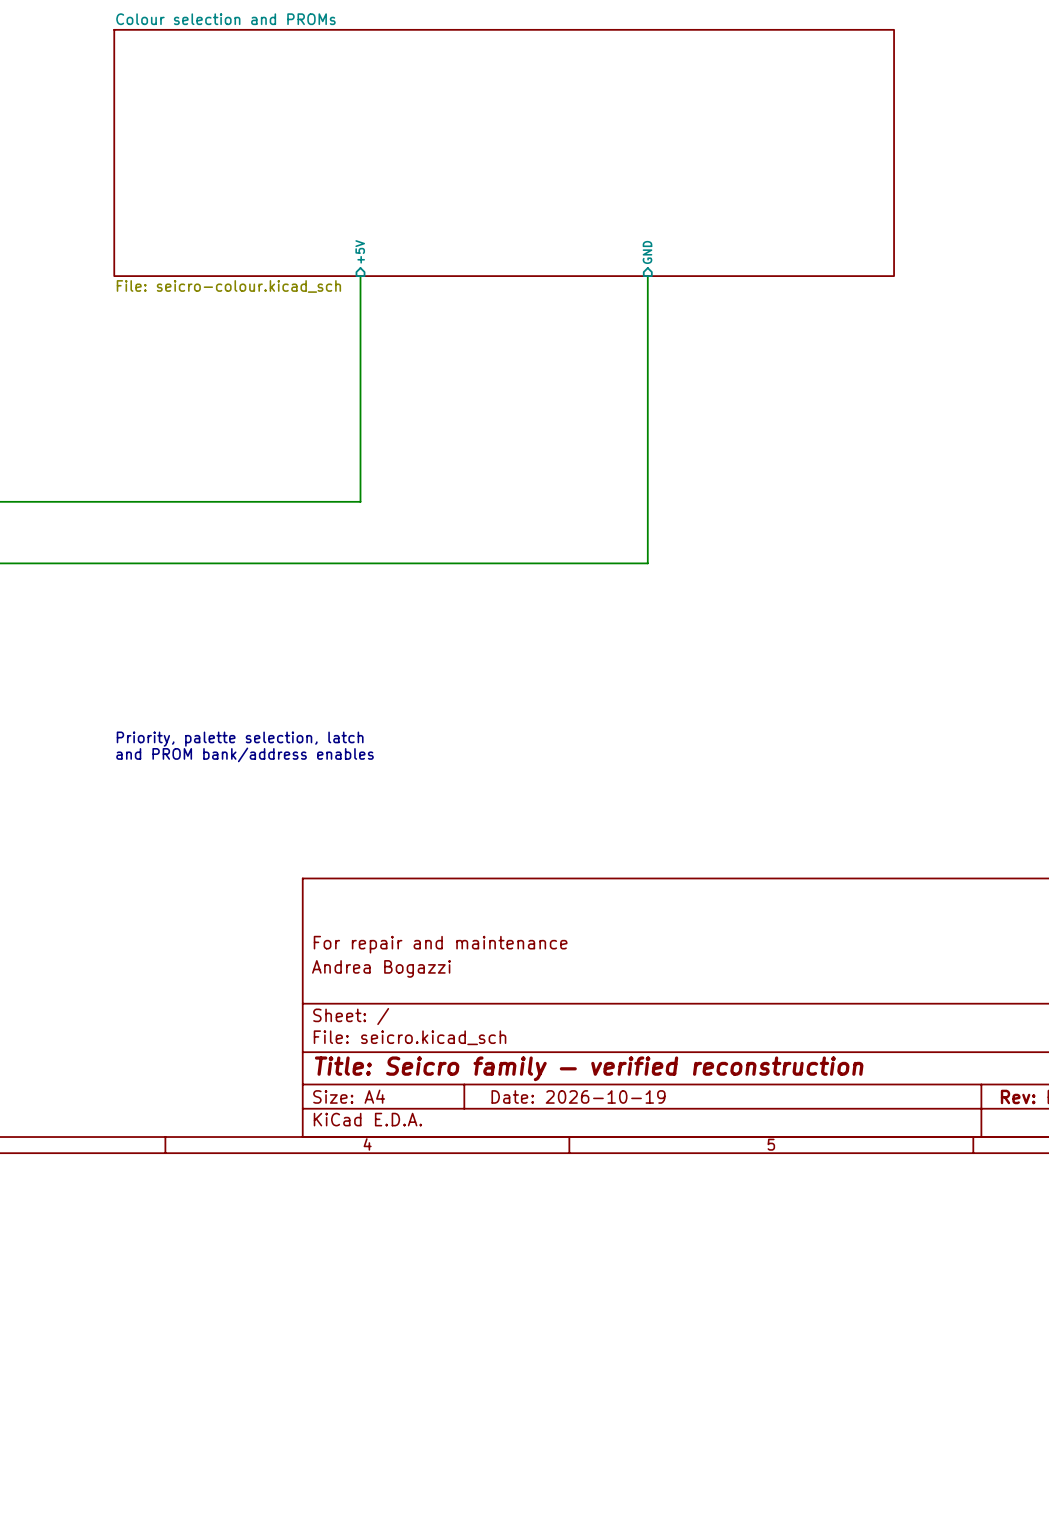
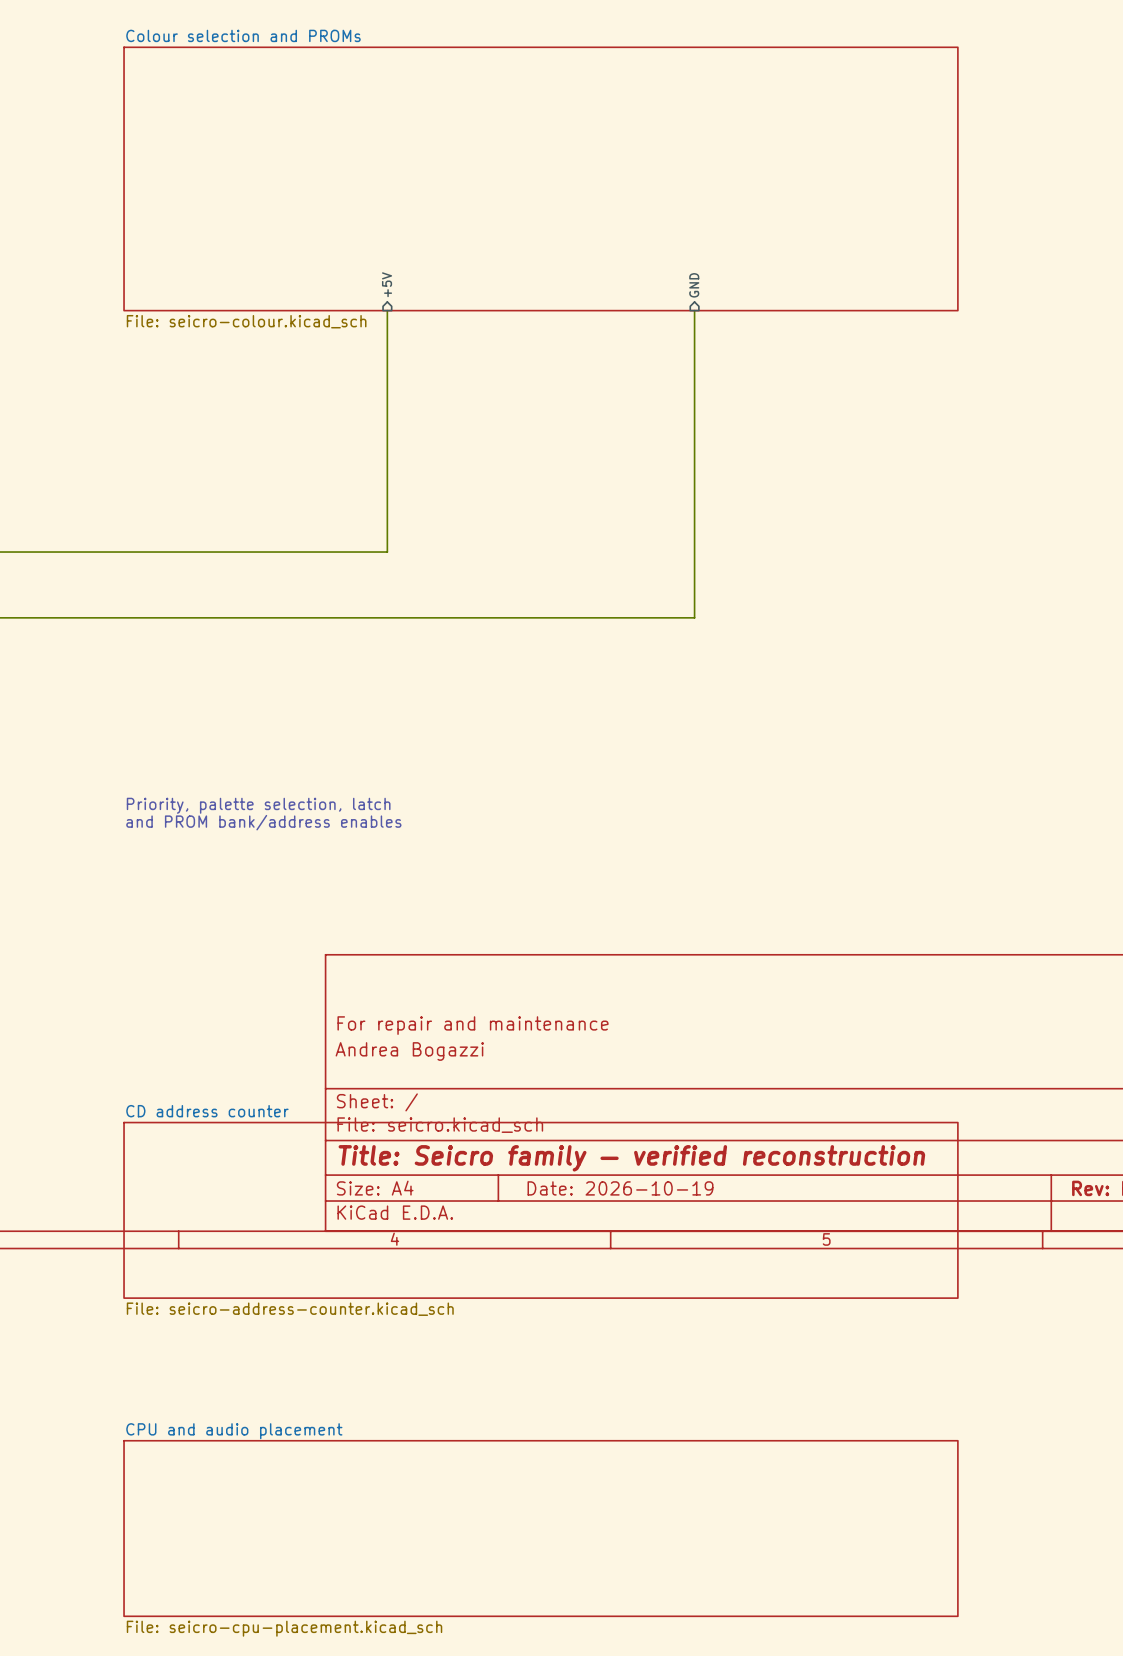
sheet CD address counter: none -> File: seicro-address-counter.kicad_sch (540, 1210)
sheet CPU and audio placement: none -> File: seicro-cpu-placement.kicad_sch (540, 1528)

